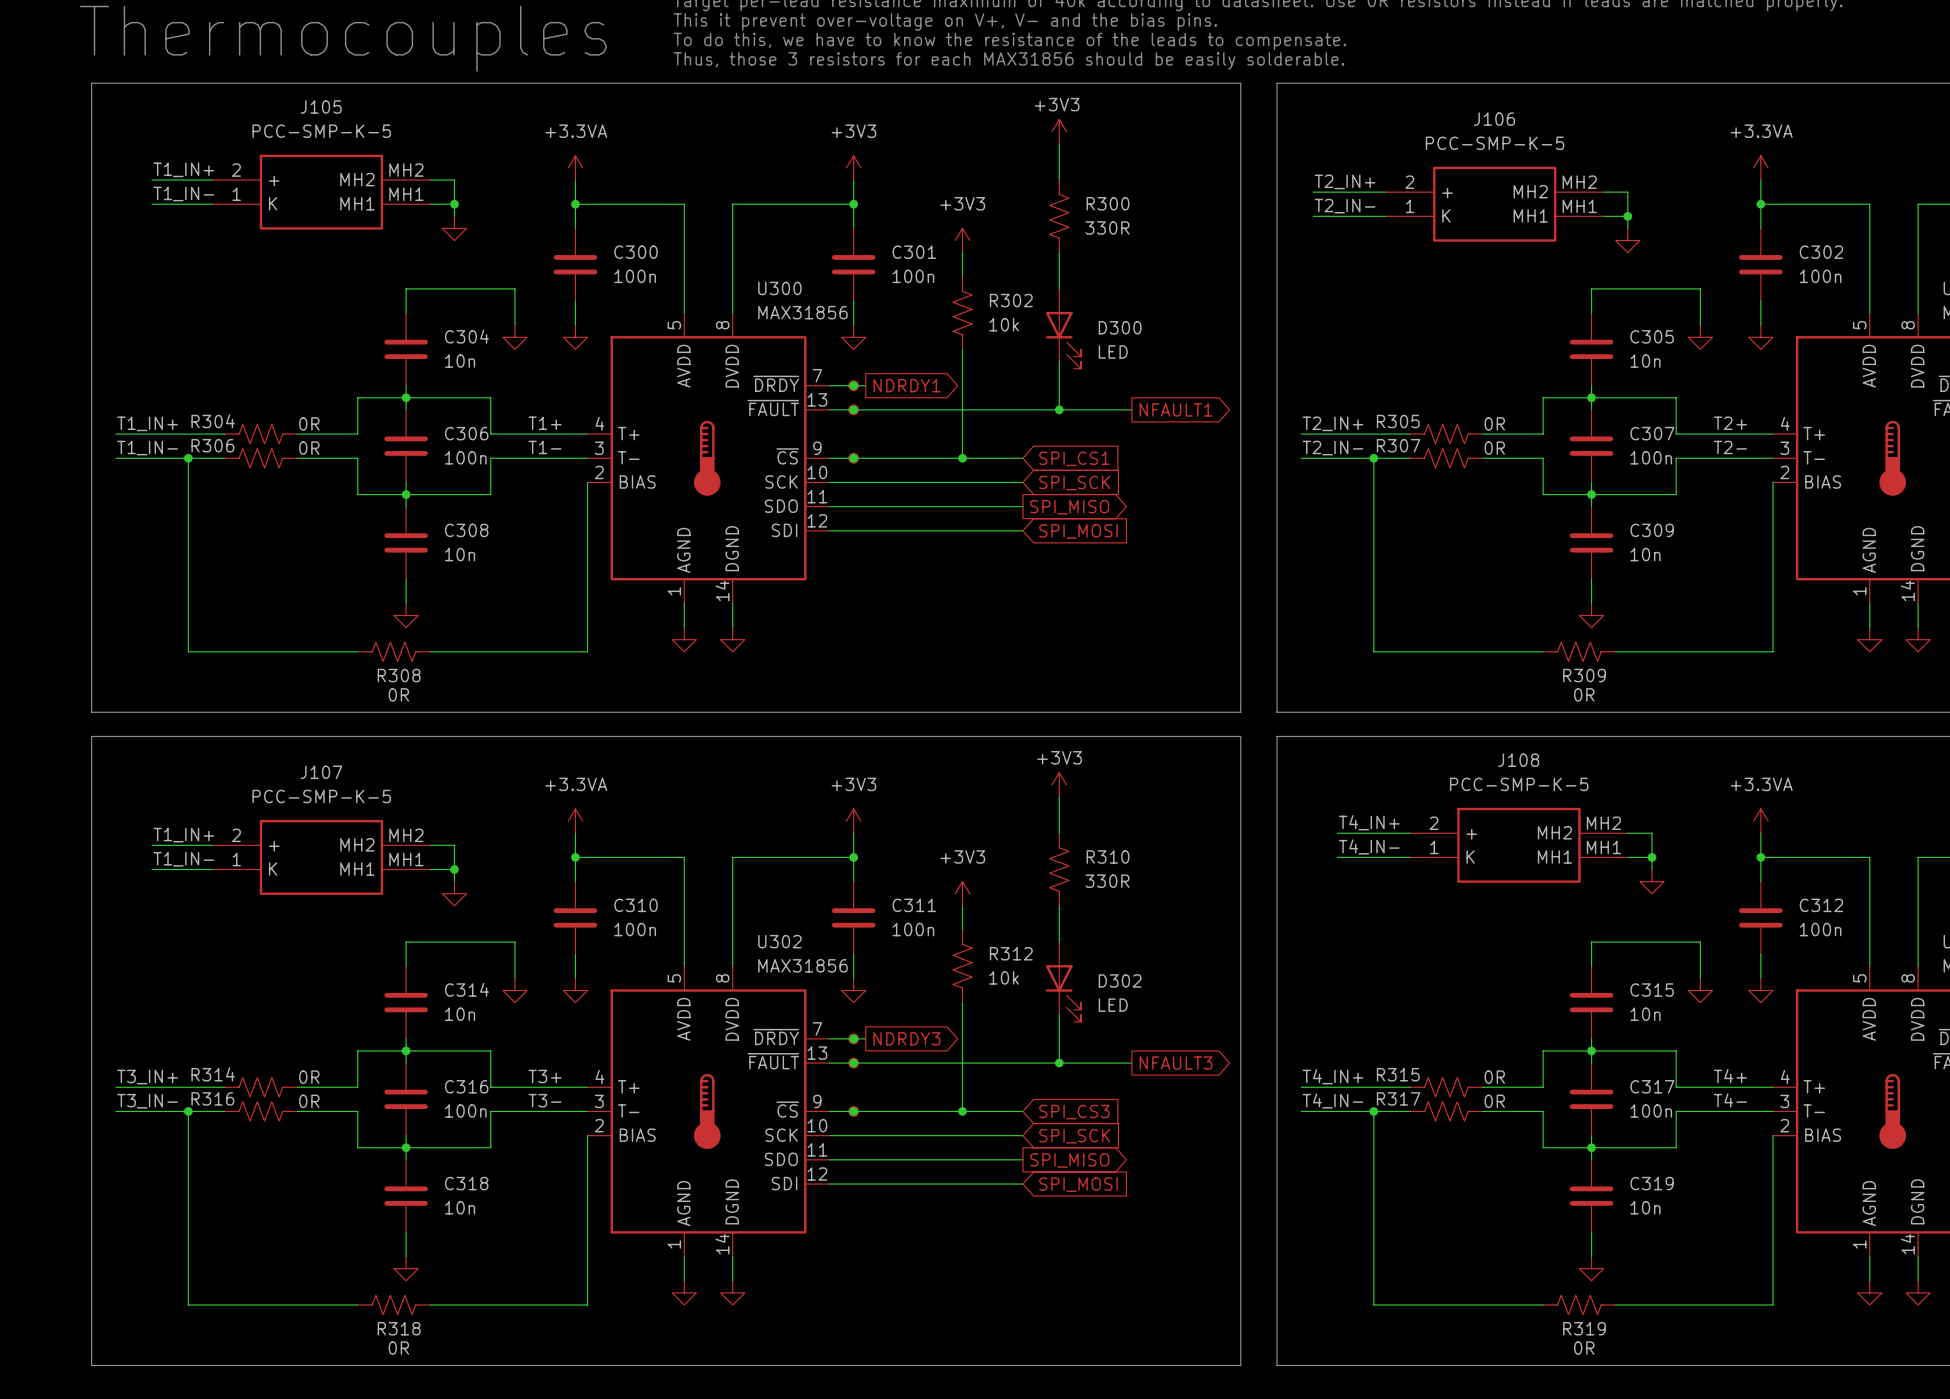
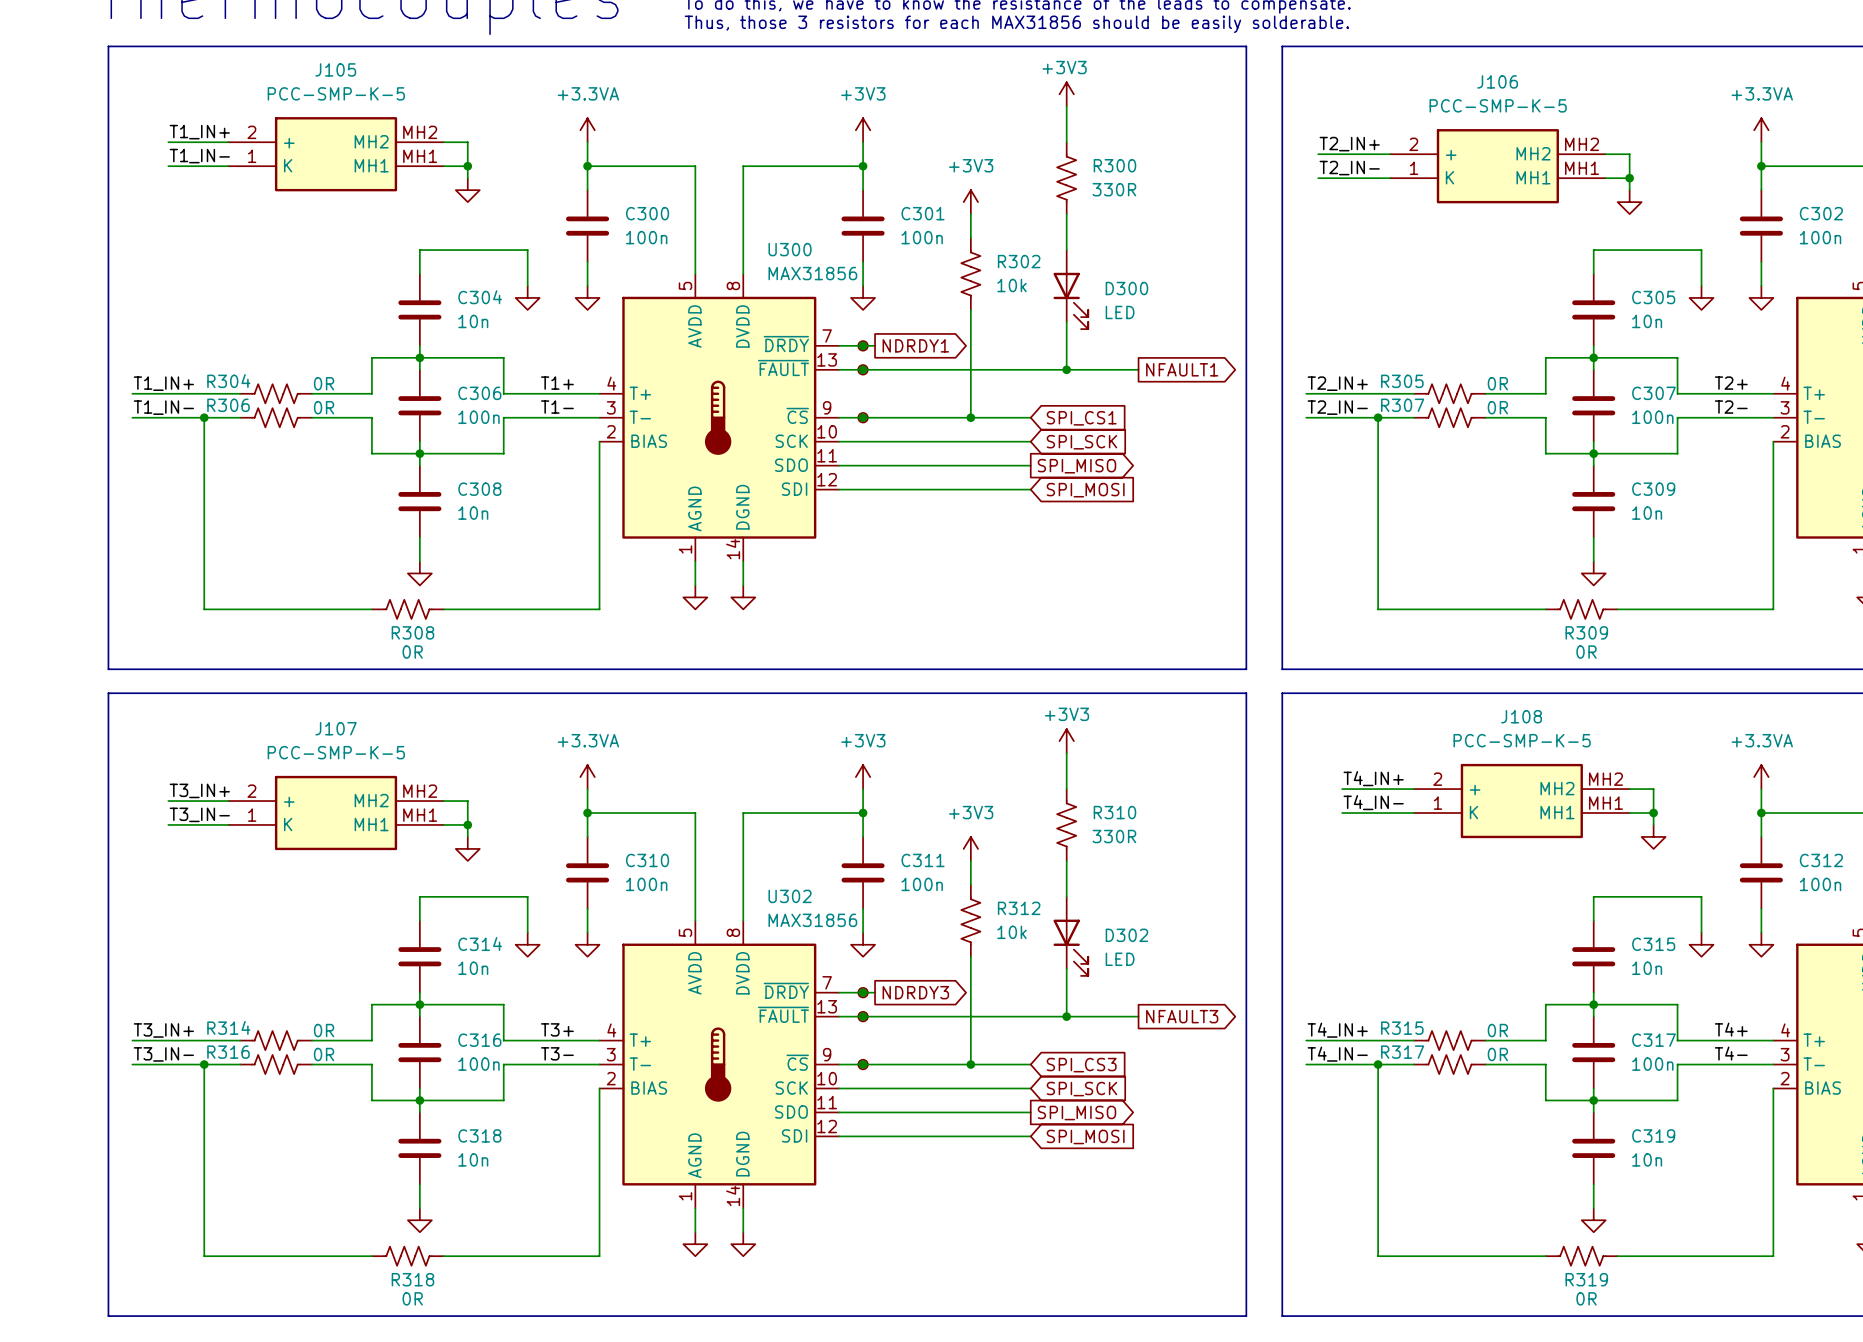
label: T1_IN+ (183, 835) -> T3_IN+ (199, 790)
label: T1_IN- (183, 859) -> T3_IN- (199, 814)

